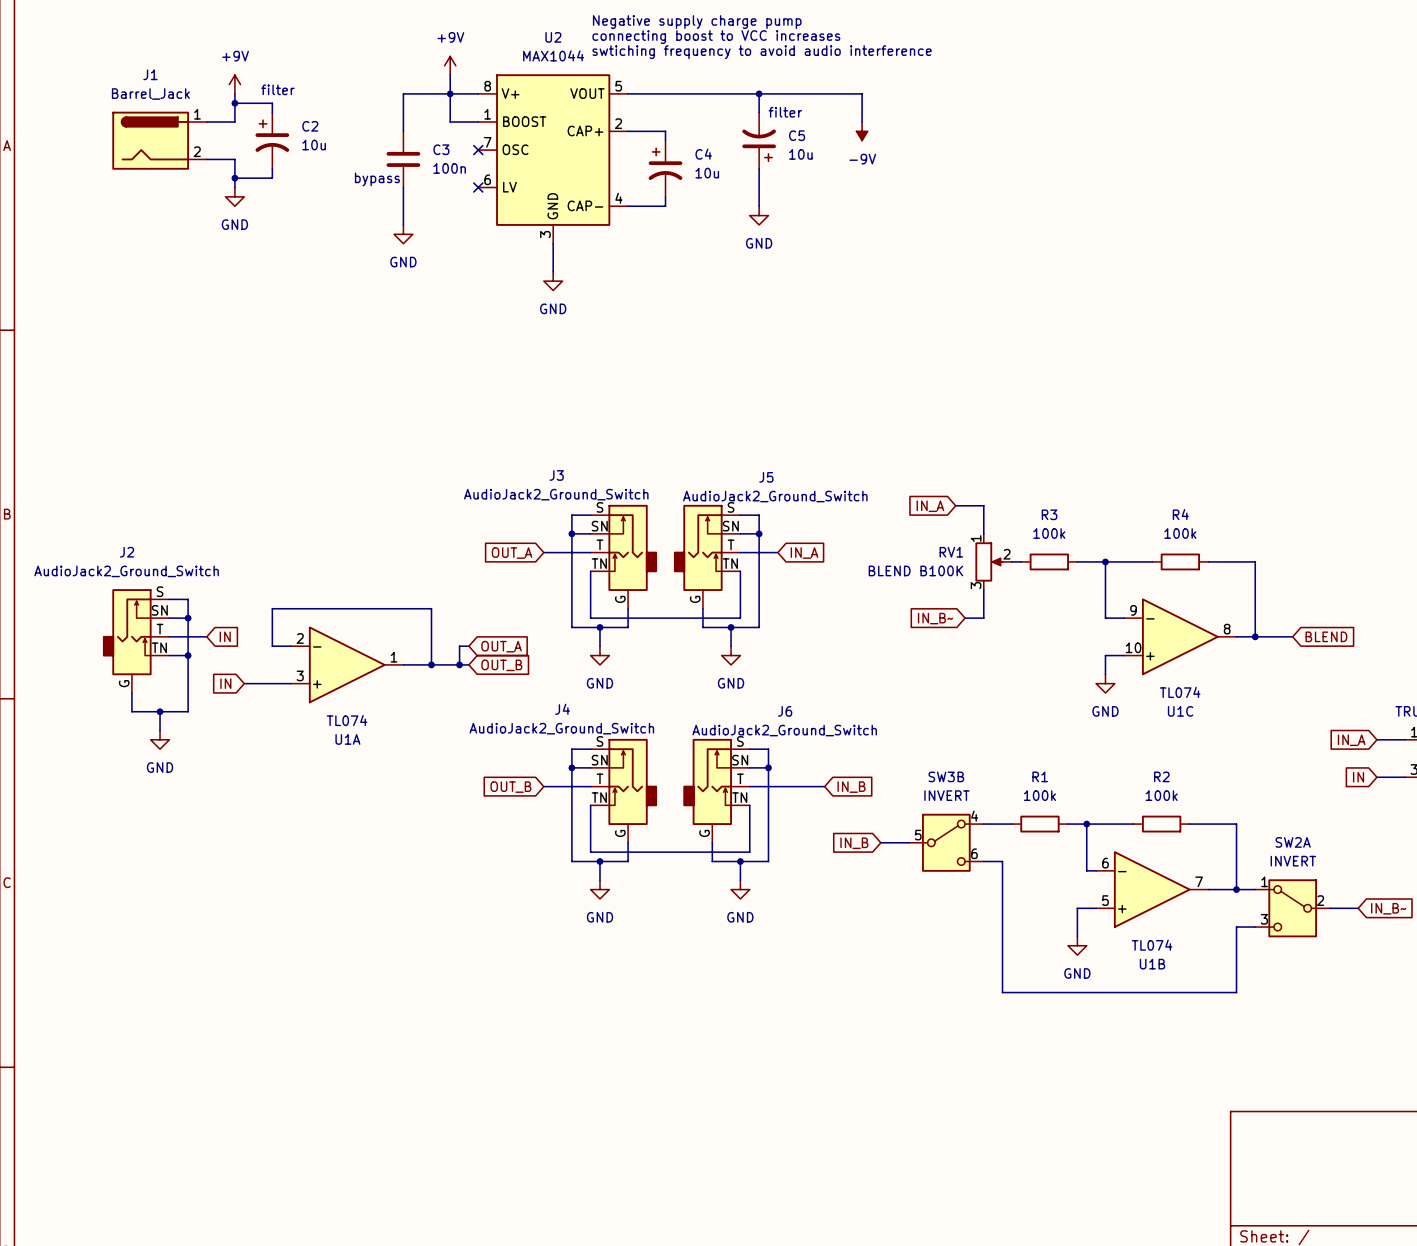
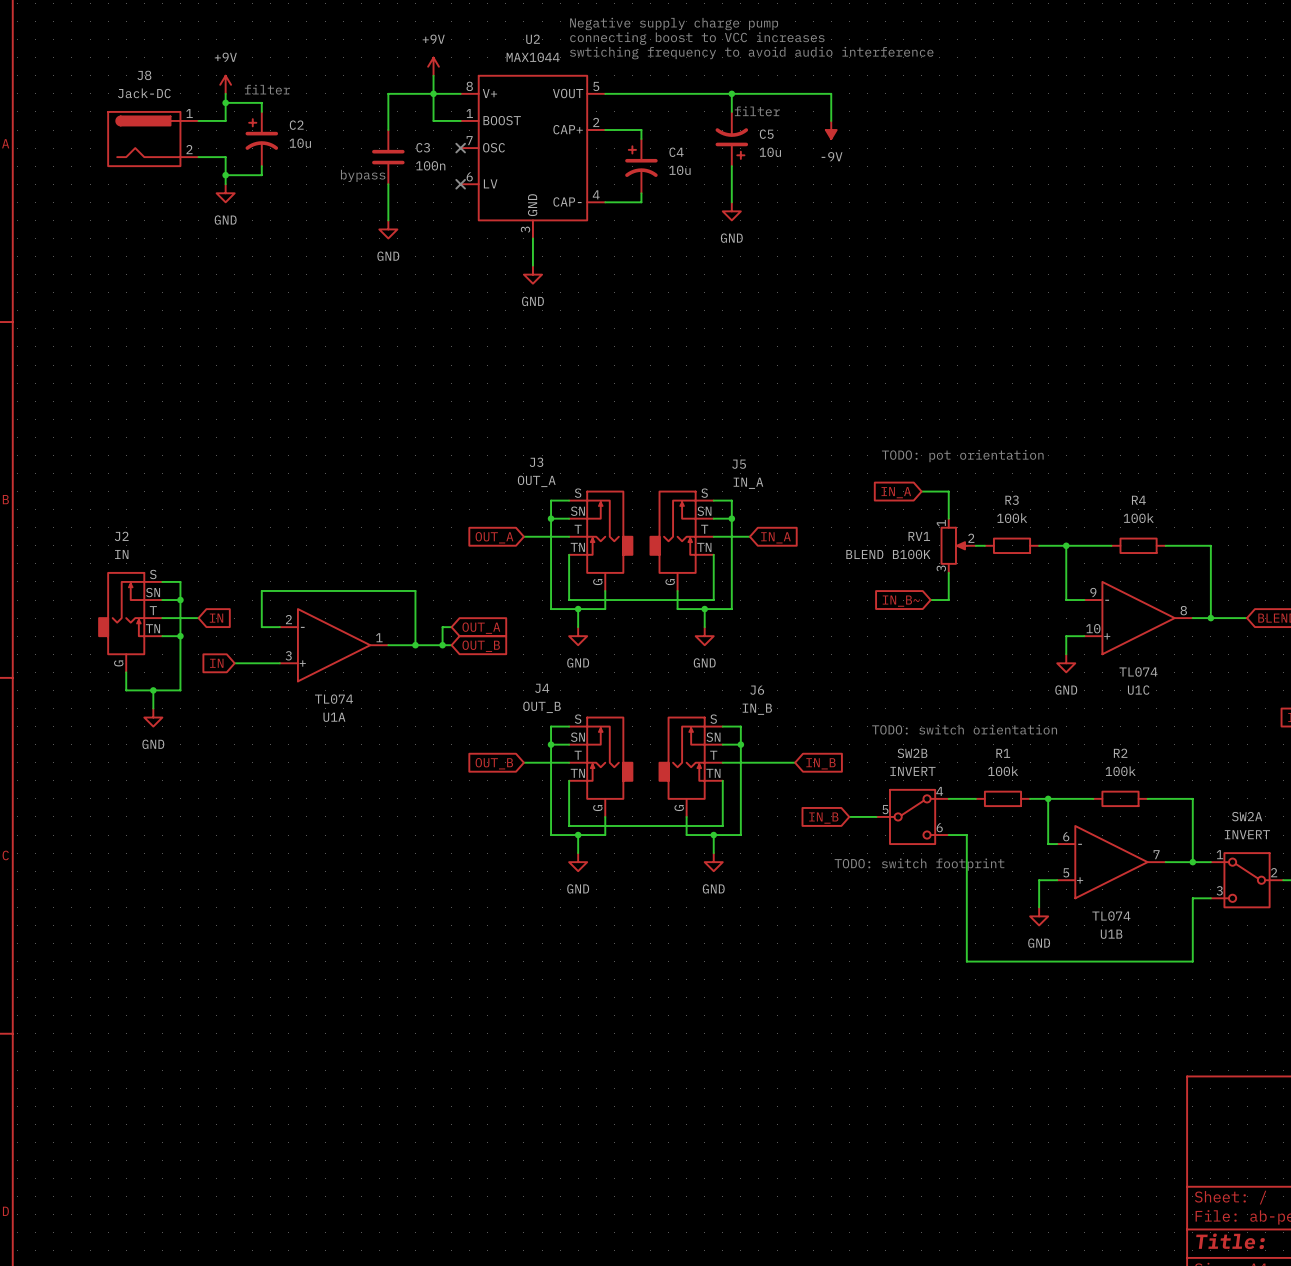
J1 name: J1 (150, 74) -> J8 (144, 75)
J1 value: Barrel_Jack (150, 94) -> Jack-DC (144, 93)
text: none -> TODO: pot orientation (962, 456)
J3 value: AudioJack2_Ground_Switch (556, 494) -> OUT_A (536, 481)
J5 value: AudioJack2_Ground_Switch (775, 496) -> IN_A (748, 483)
J2 value: AudioJack2_Ground_Switch (126, 571) -> IN (121, 554)
J4 value: AudioJack2_Ground_Switch (561, 728) -> OUT_B (541, 707)
J6 value: AudioJack2_Ground_Switch (784, 730) -> IN_B (757, 709)
text: none -> TODO: switch orientation (964, 729)
SW3B name: SW3B (946, 776) -> SW2B (912, 753)
text: none -> TODO: switch footprint (919, 864)

